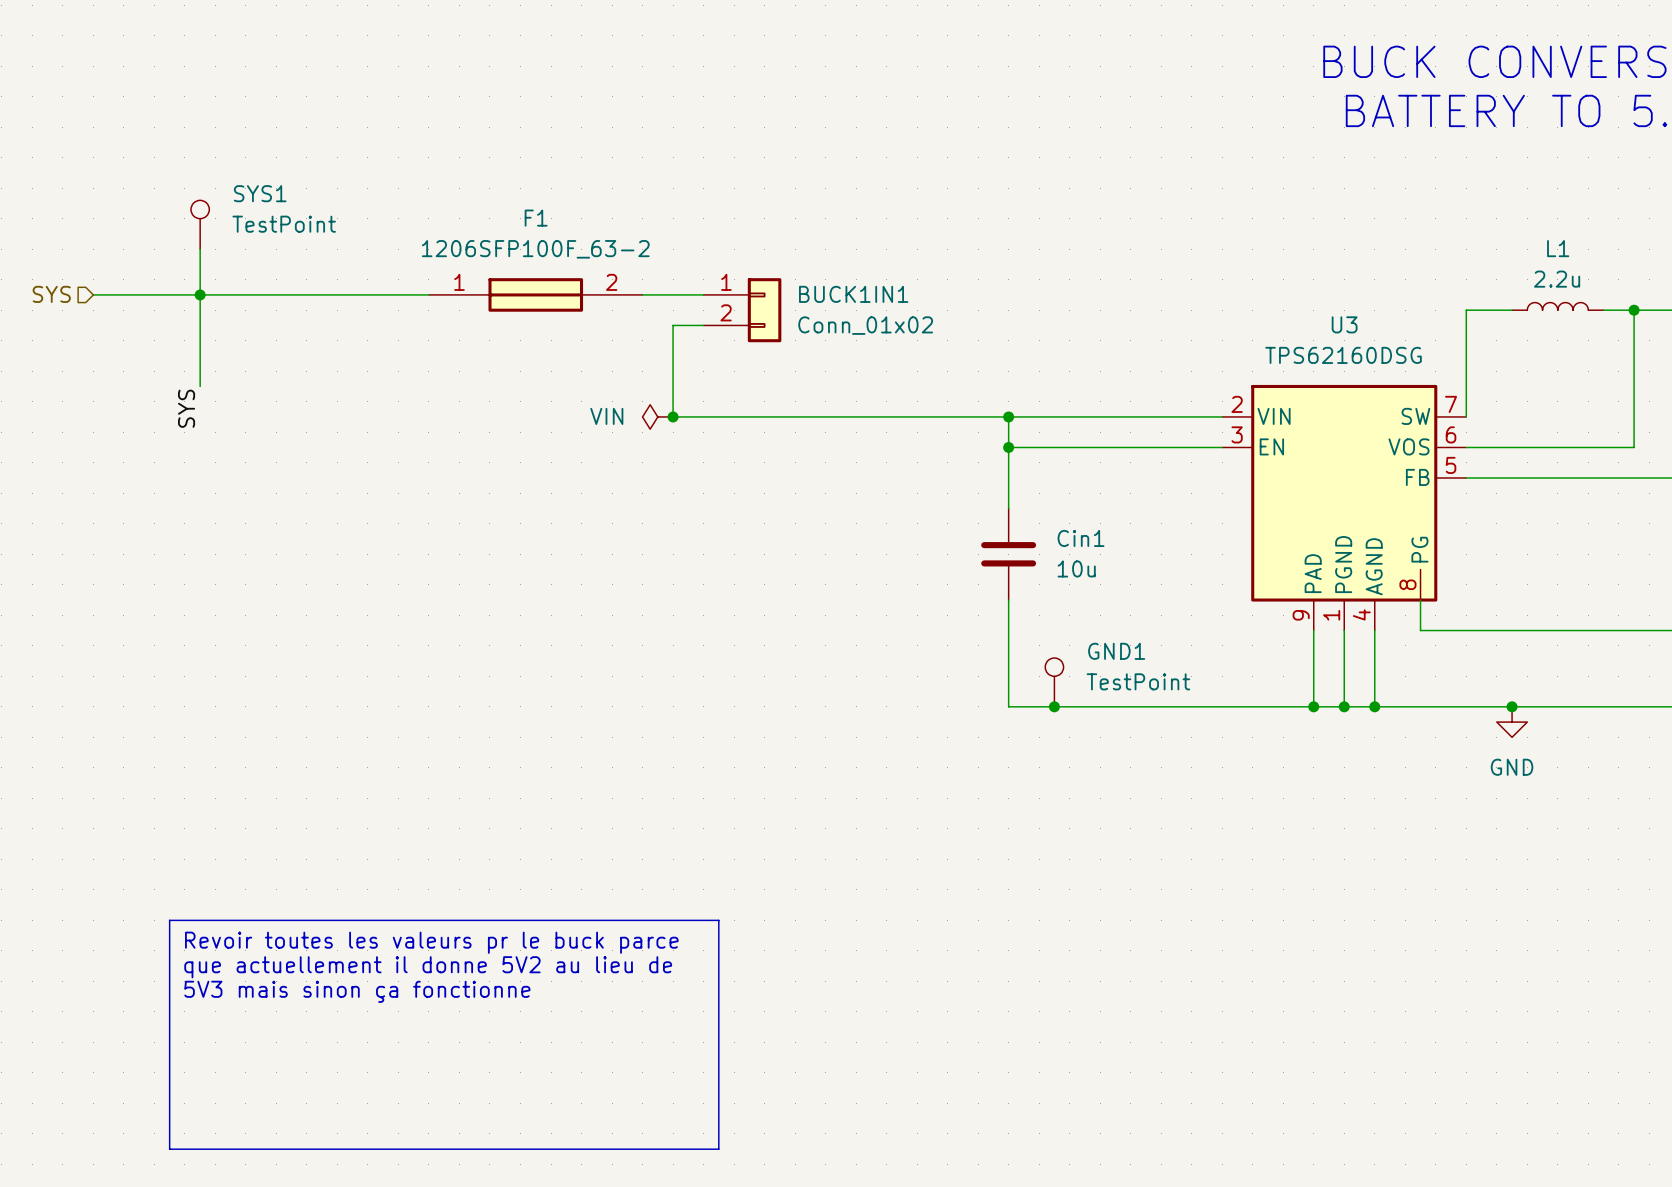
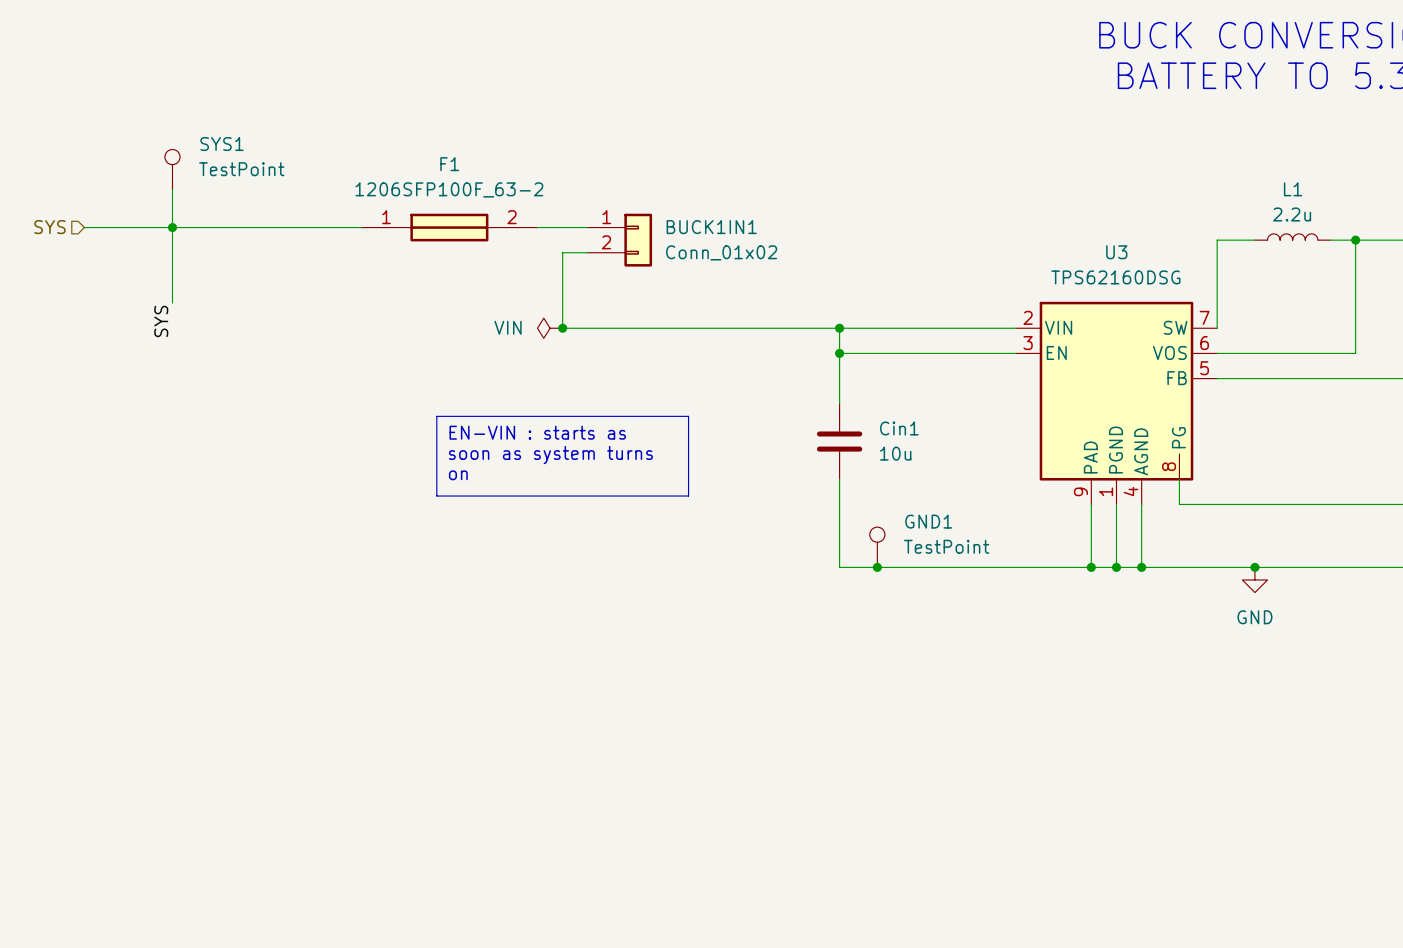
line: none -> (436, 416) (688, 416) (688, 496) (436, 496) (436, 416)
text: none -> EN-VIN : starts as (537, 432)
text: none -> soon as system turns (550, 455)
text: none -> on (458, 475)
line: (169, 920) (718, 920) (718, 1149) (169, 1149) (169, 920) -> none
text: Revoir toutes les valeurs pr le buck parce (431, 942) -> none
text: que actuellement il donne 5V2 au lieu de (428, 967) -> none
text: 5V3 mais sinon ça fonctionne (357, 991) -> none

